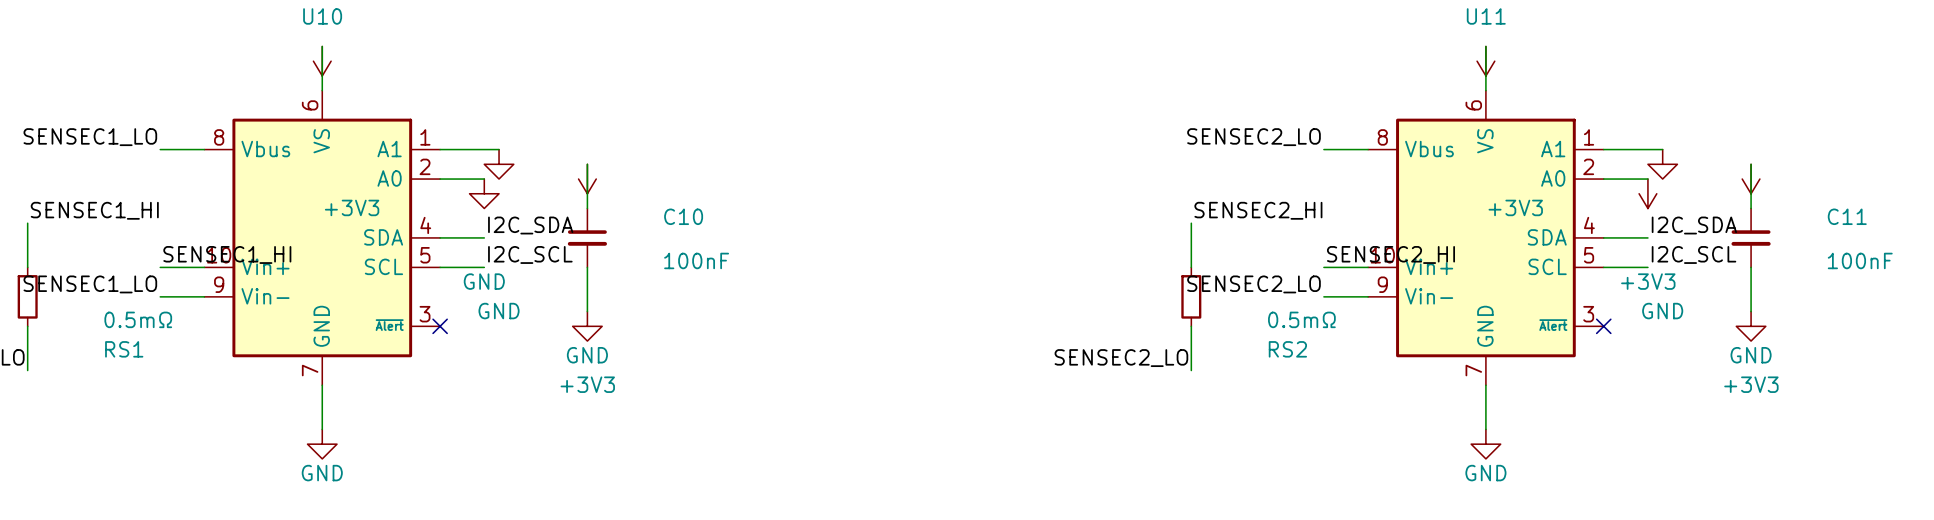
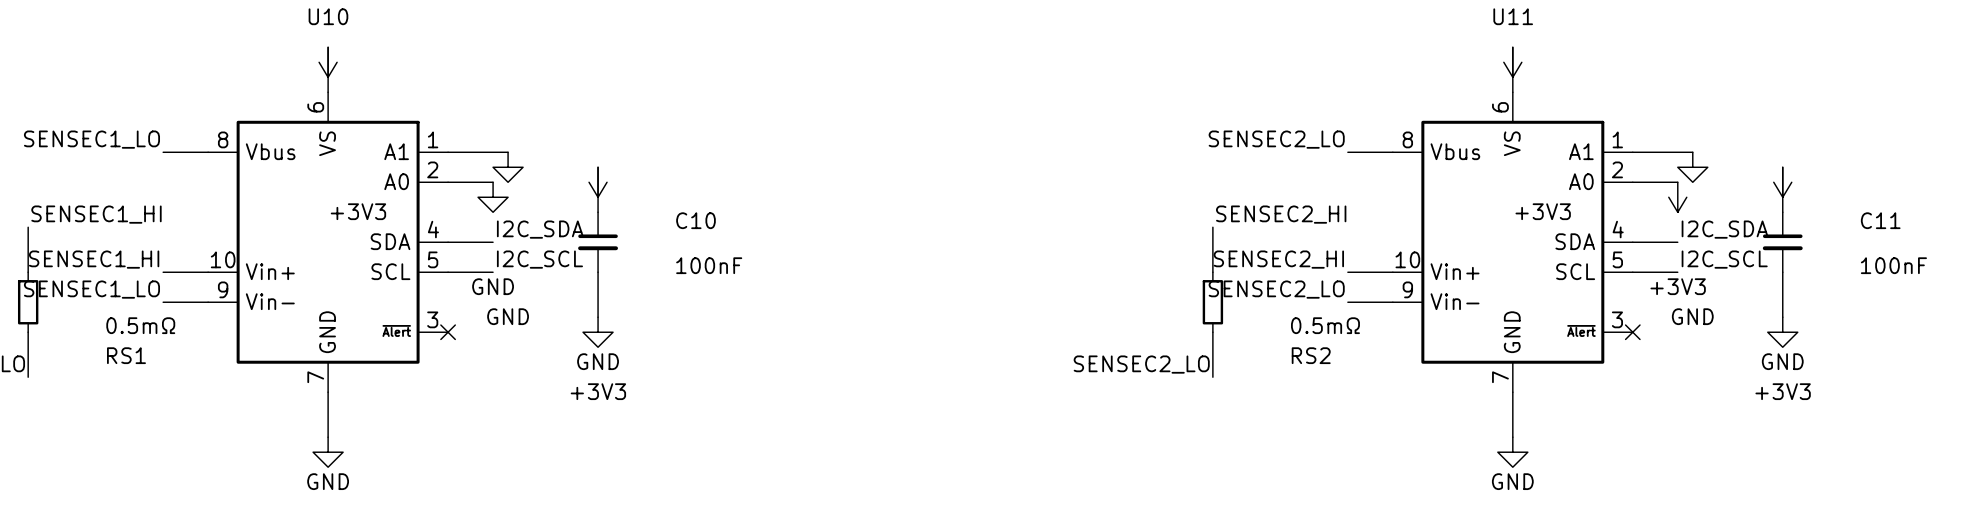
label position: SENSEC1_HI (227, 254) -> SENSEC1_HI (94, 259)
label position: SENSEC2_HI (1390, 254) -> SENSEC2_HI (1278, 259)

